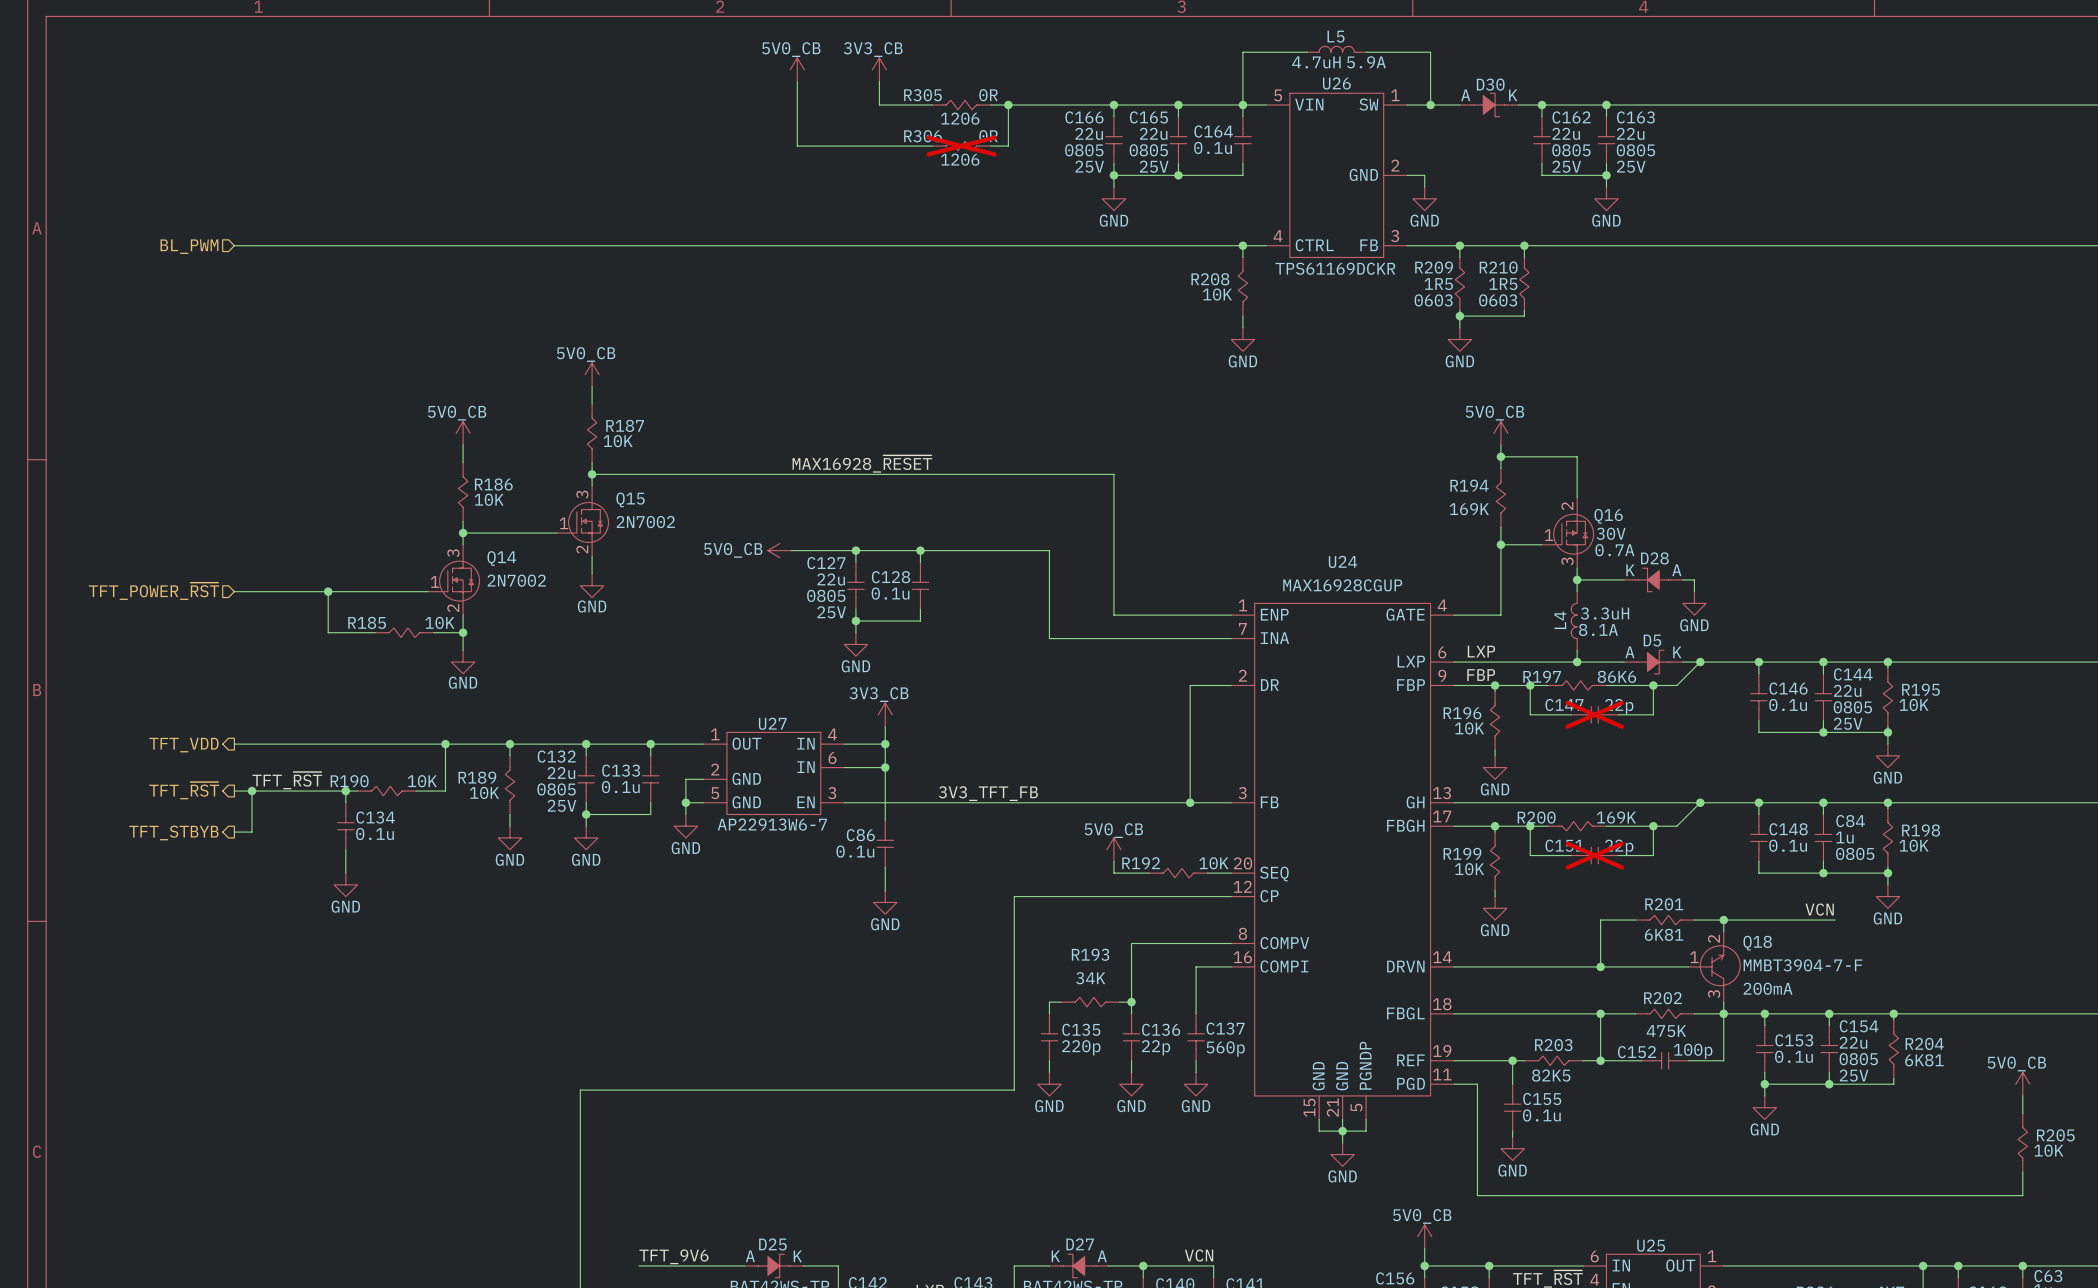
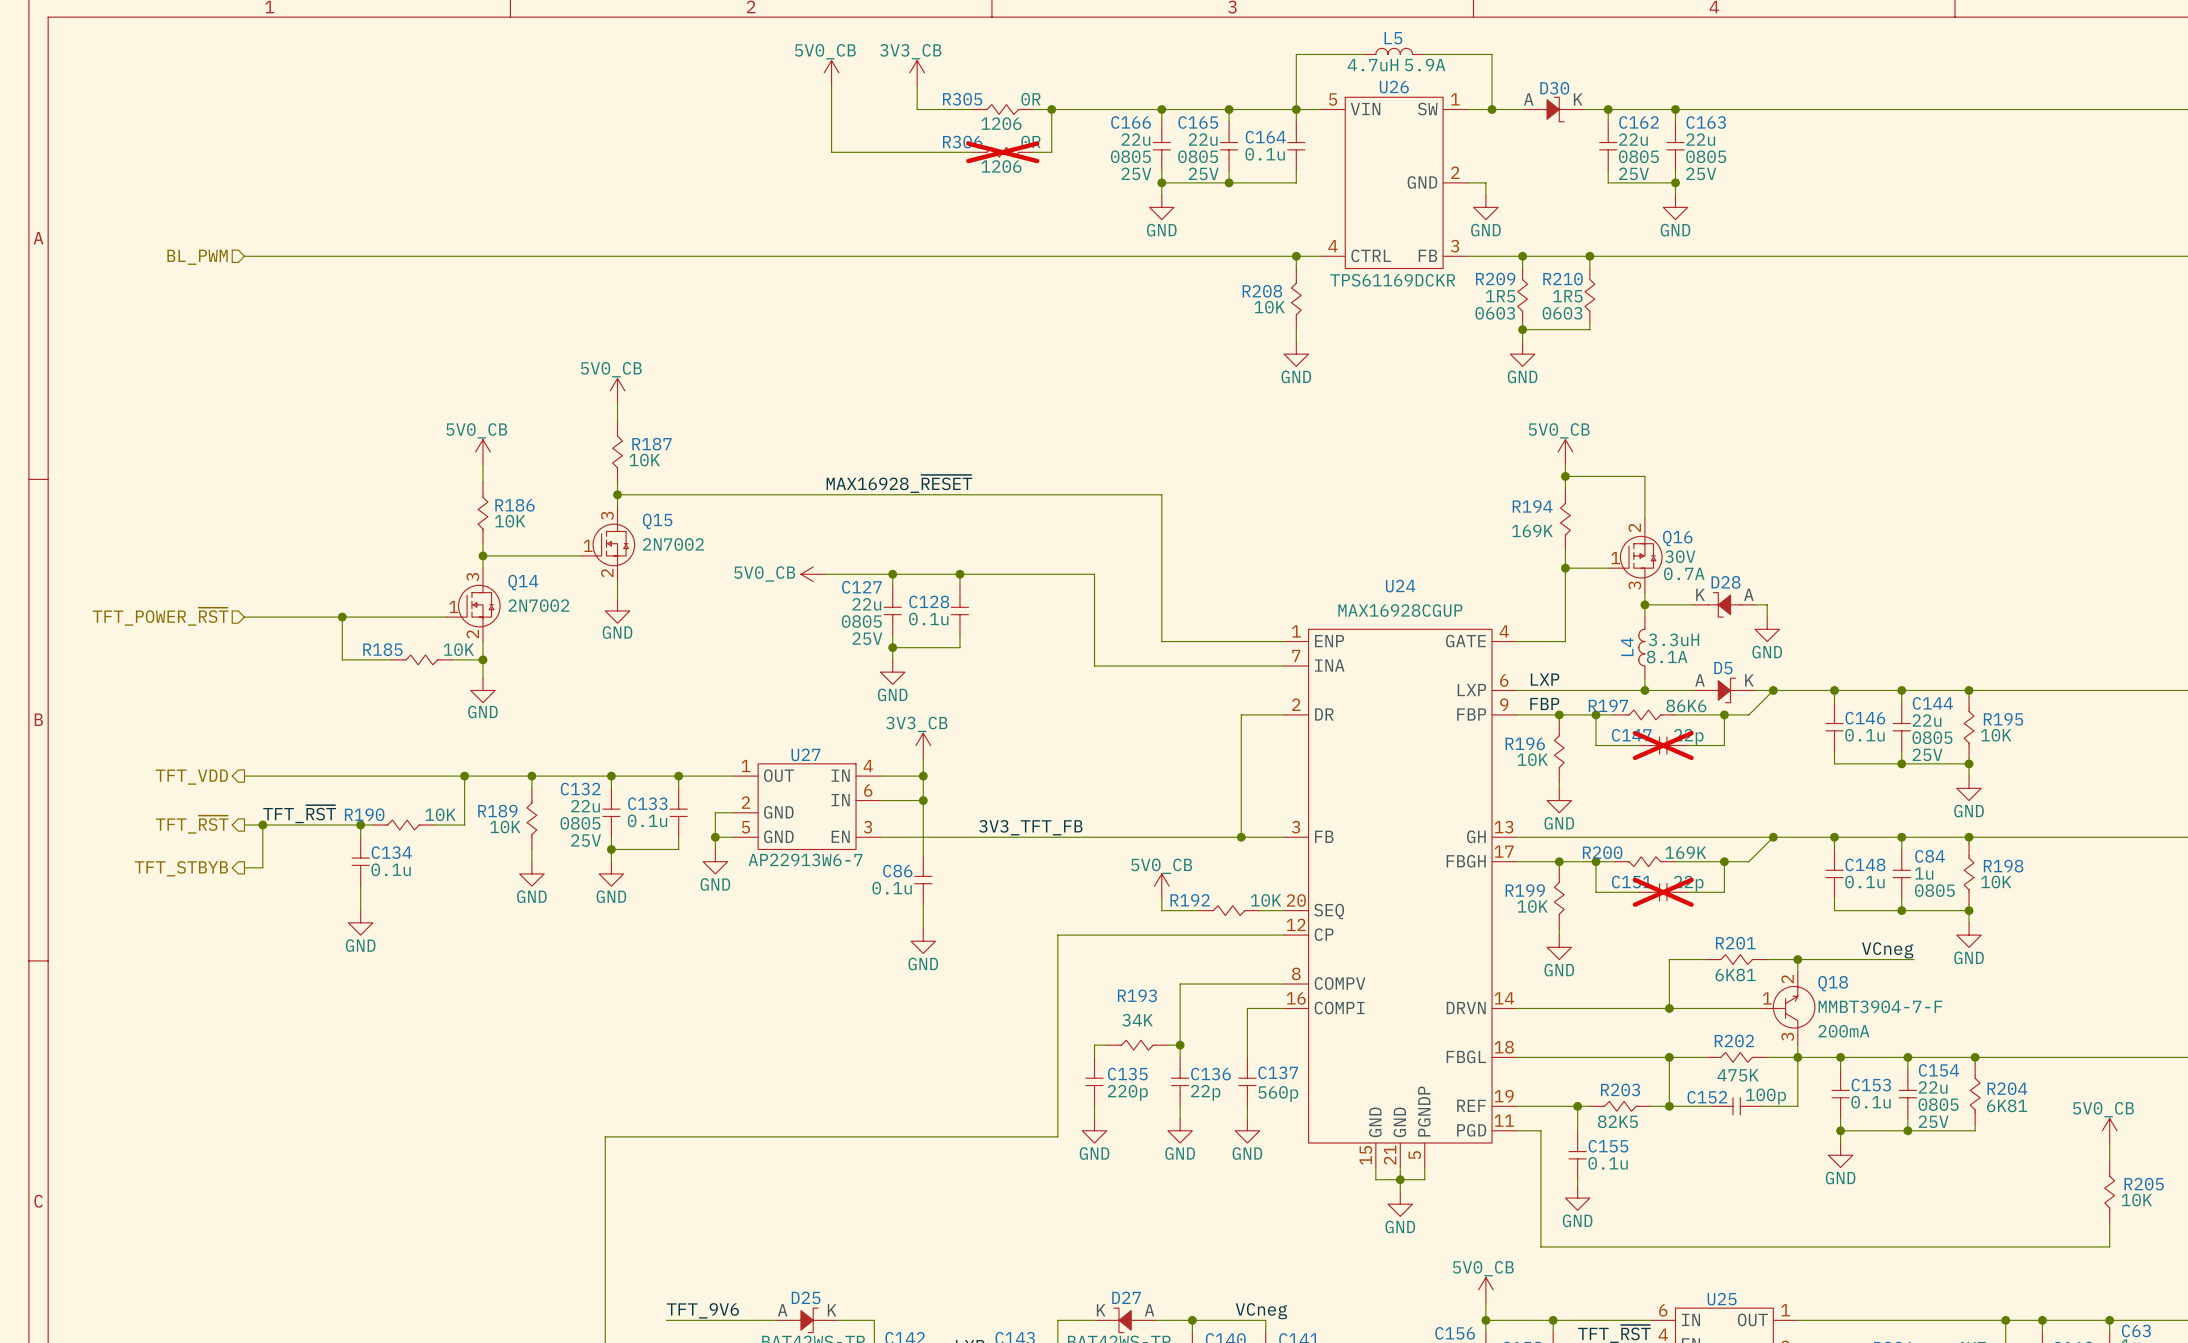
label: VCN (1819, 909) -> VCneg (1887, 950)
label: VCN (1199, 1255) -> VCneg (1261, 1311)

